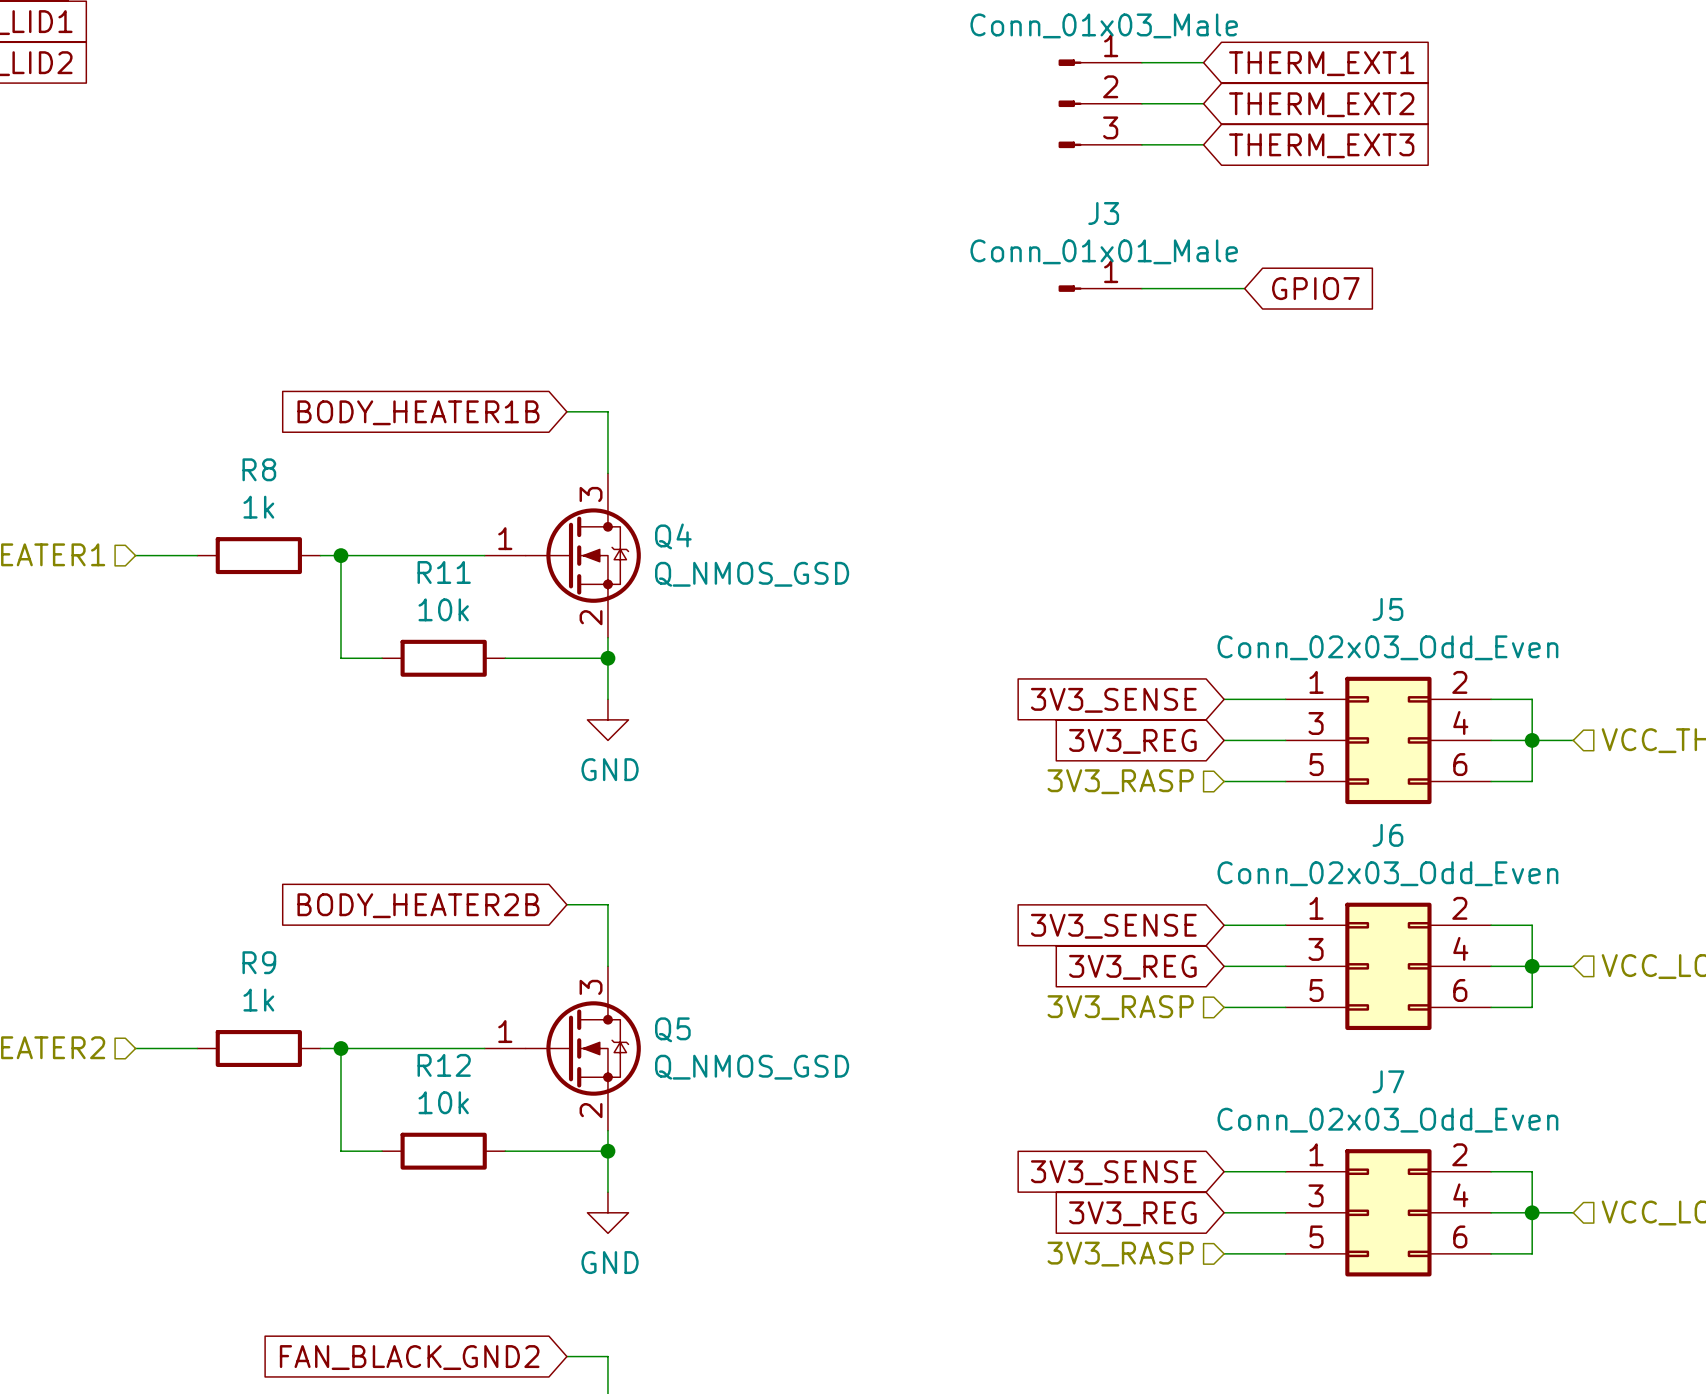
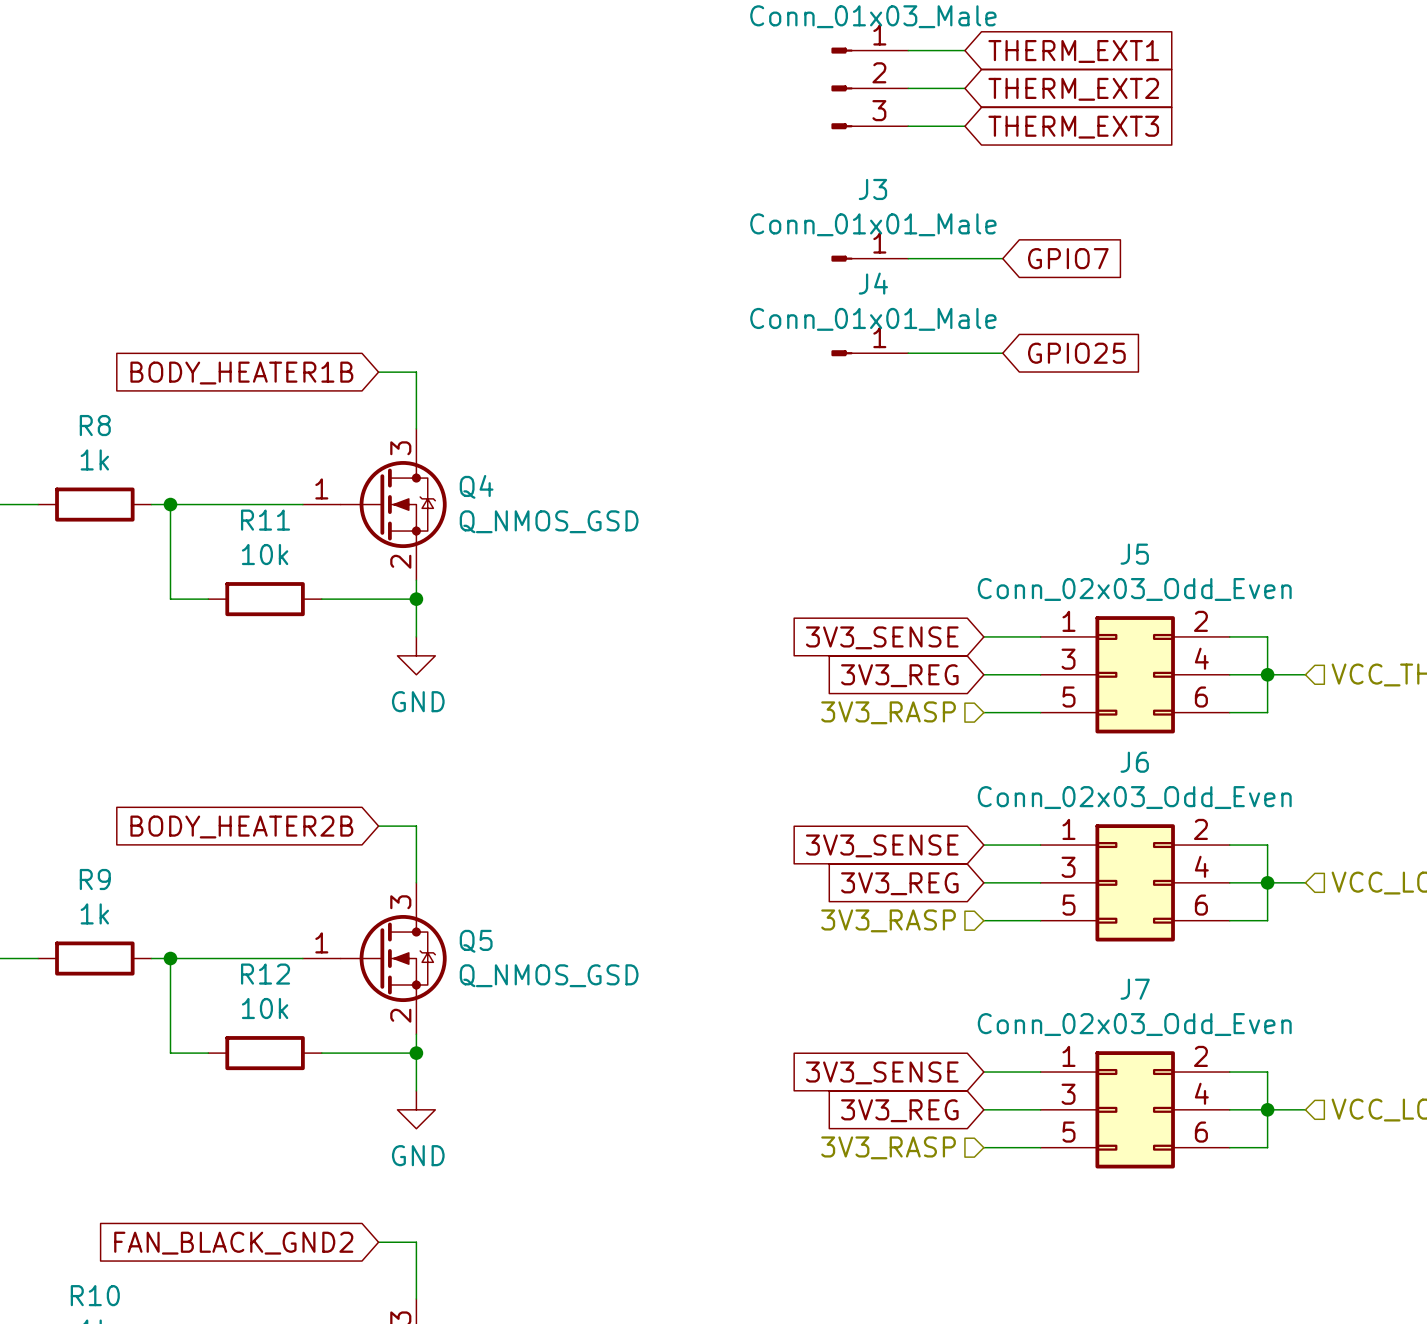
J4: none -> Conn_01x01_Male (869, 353)
wire: none -> (908, 353) (1002, 353)
global label: none -> GPIO25 (1076, 353)

